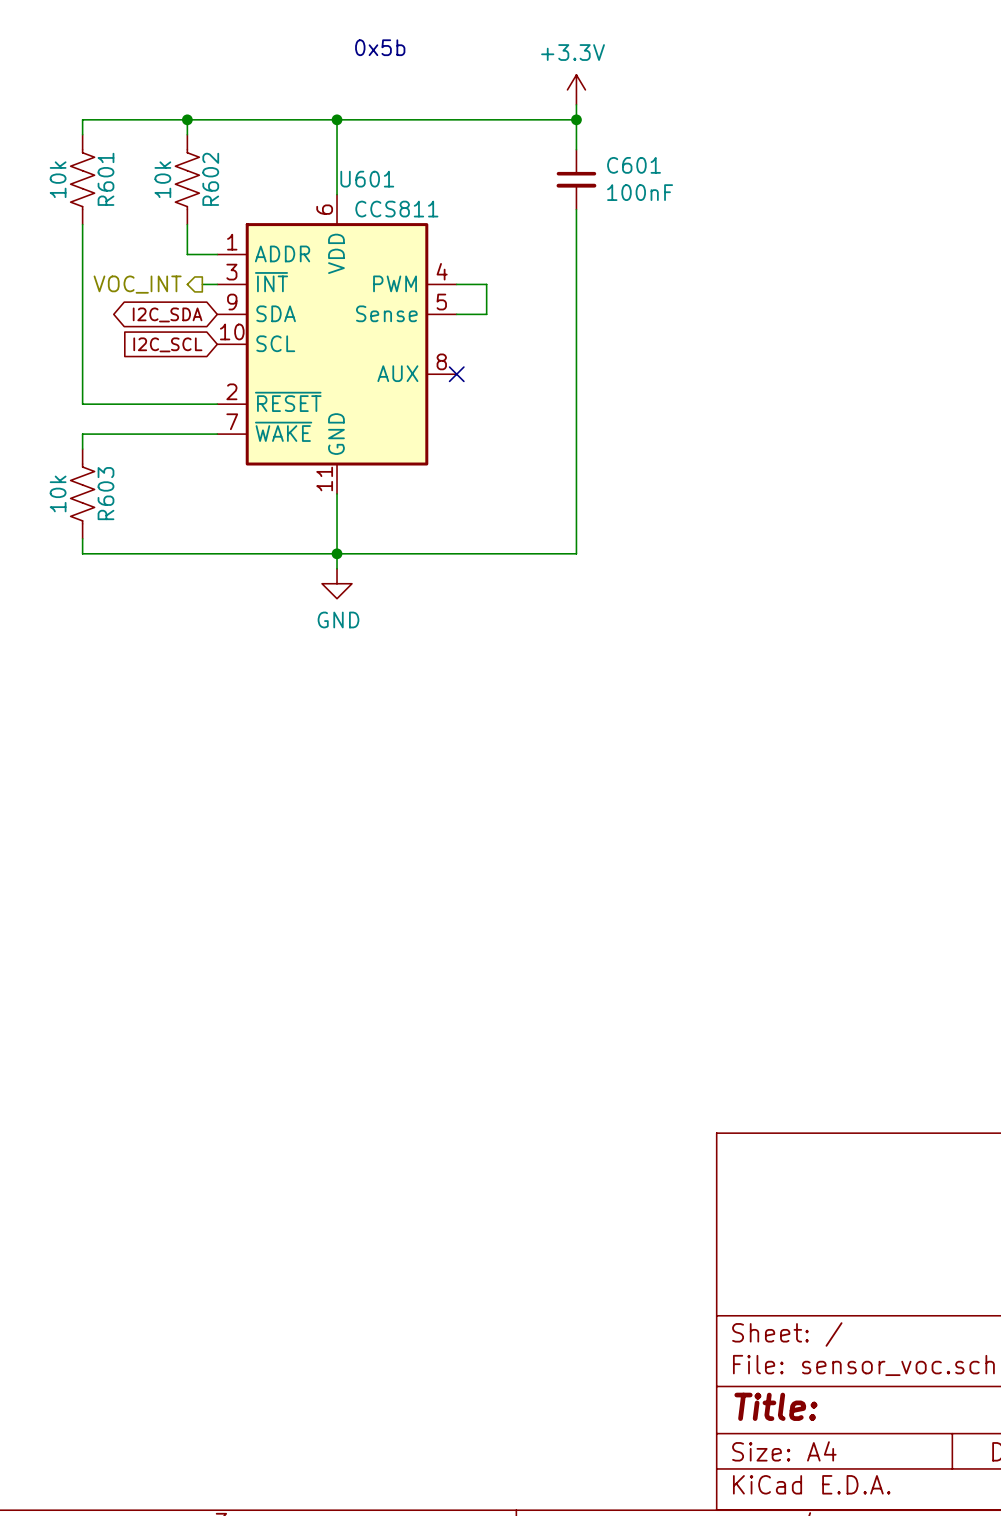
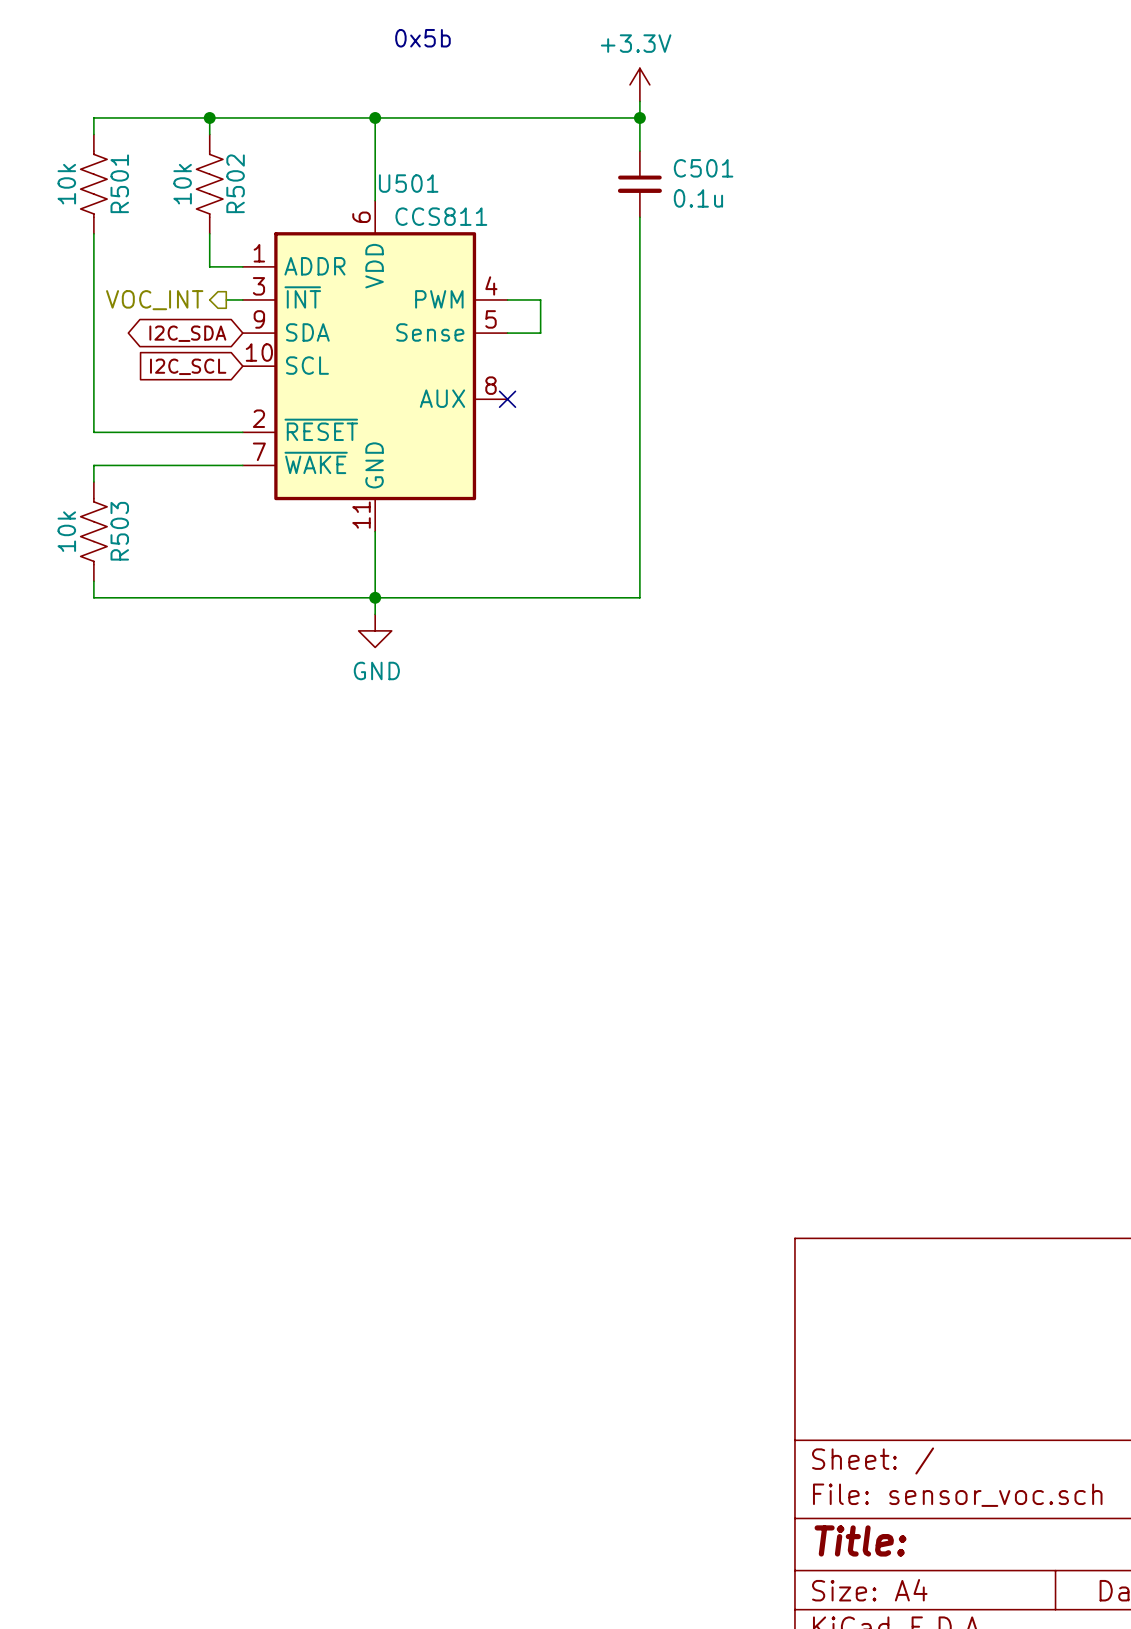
C601 name: C601 (634, 165) -> C501 (703, 168)
R601 name: R601 (105, 179) -> R501 (119, 183)
R602 name: R602 (210, 179) -> R502 (235, 183)
U601 name: U601 (367, 179) -> U501 (408, 183)
C601 value: 100nF (640, 192) -> 0.1u (698, 198)
R603 name: R603 (105, 493) -> R503 (119, 531)

